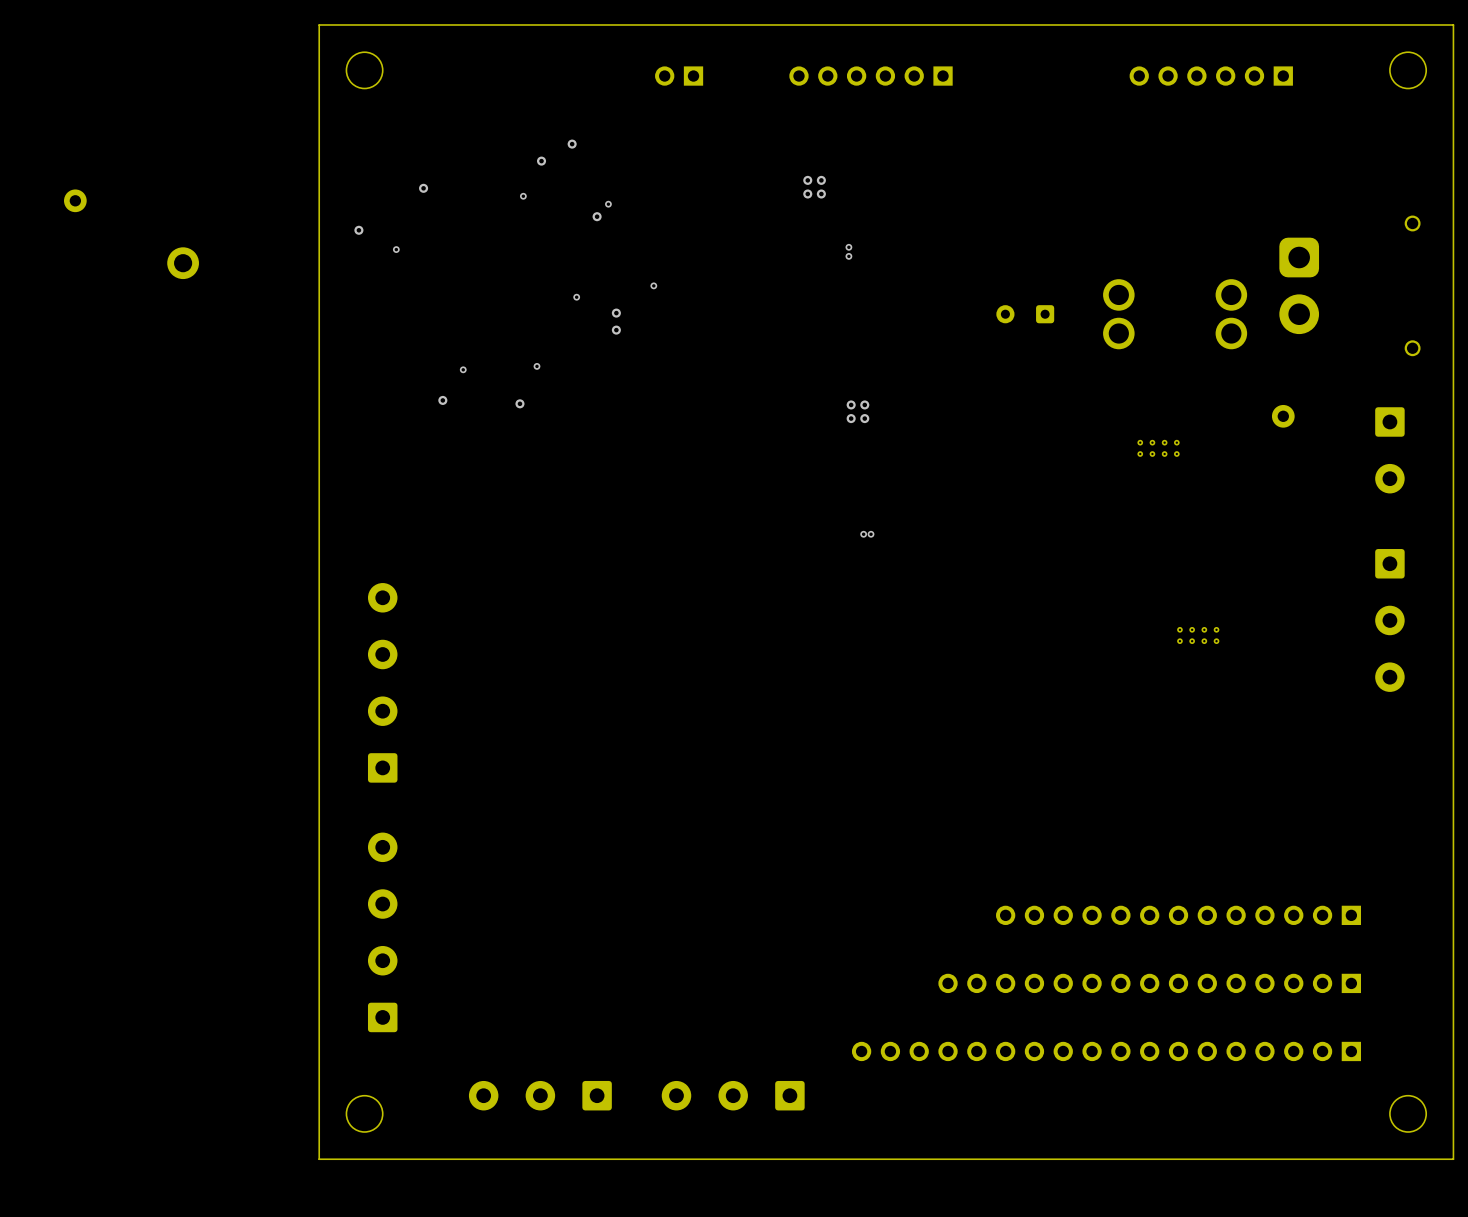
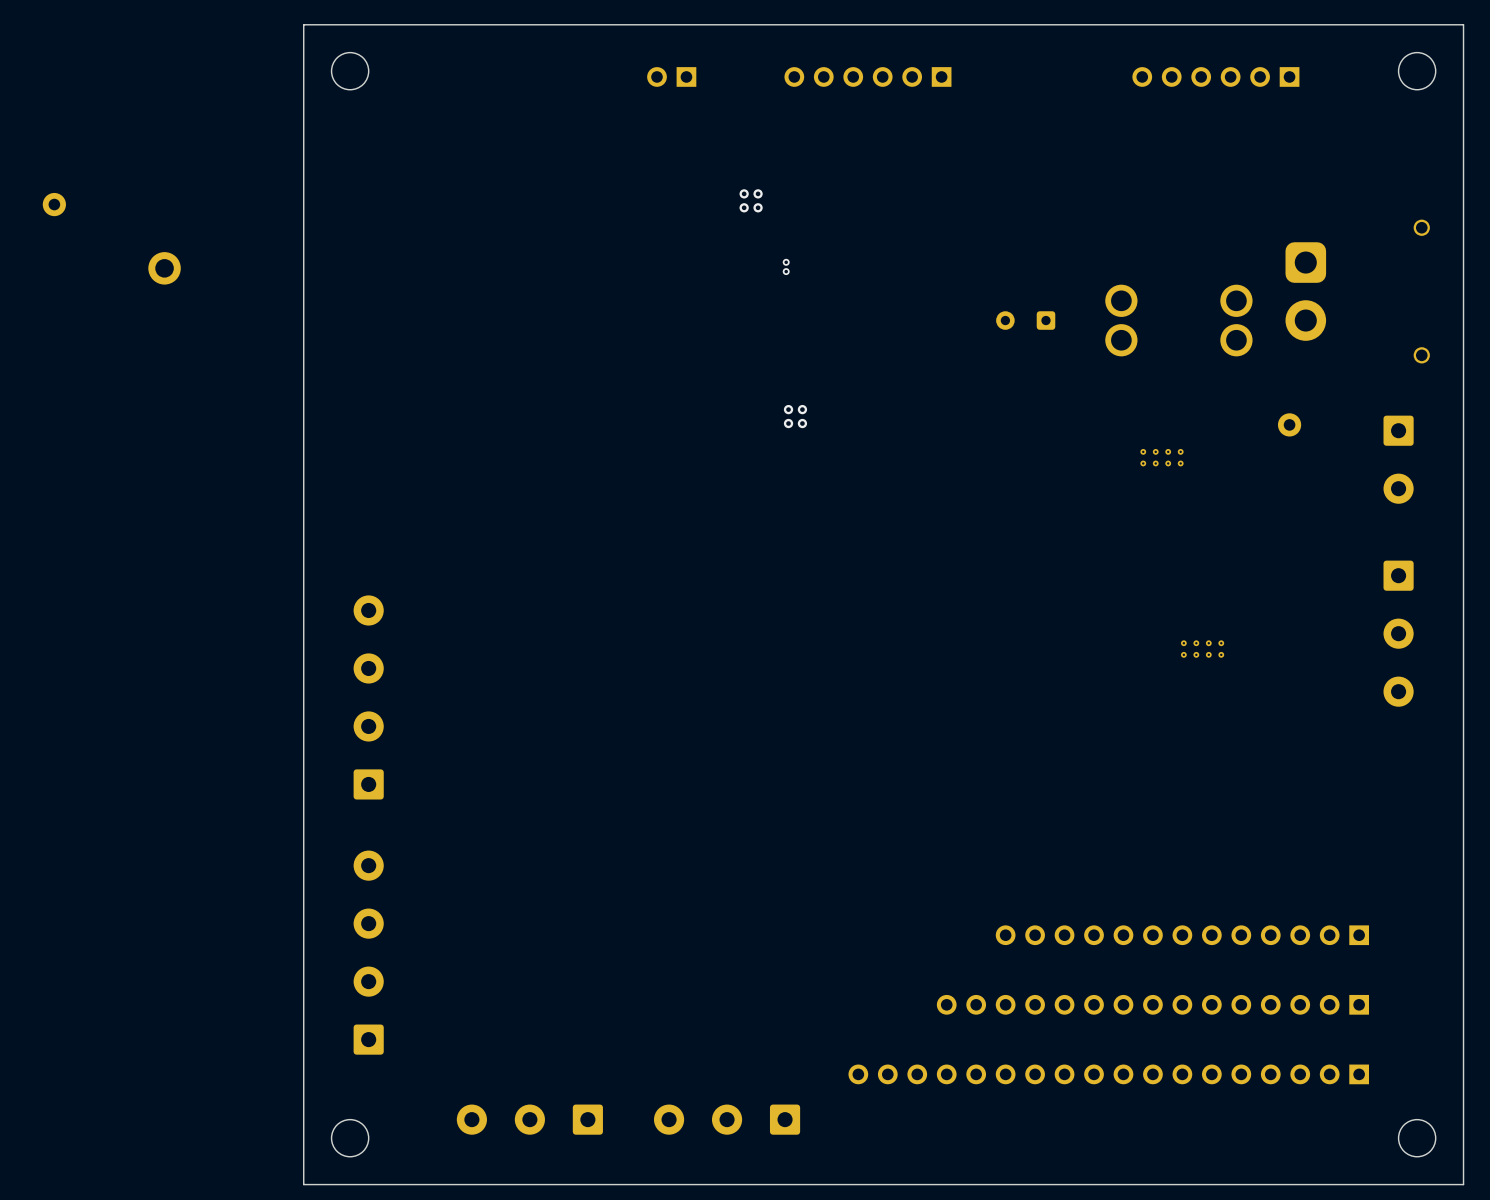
via: (572, 144) -> none
via: (541, 161) -> none
via: (807, 180) -> none
via: (821, 180) -> none
via: (423, 188) -> none
via: none -> (744, 193)
via: none -> (758, 193)
via: (807, 193) -> none
via: (821, 193) -> none
via: (523, 196) -> none
via: none -> (744, 207)
via: none -> (758, 207)
via: (608, 204) -> none
via: (597, 216) -> none
via: (358, 230) -> none
via: (848, 247) -> none
via: (396, 249) -> none
via: (848, 256) -> none
via: none -> (786, 262)
via: none -> (786, 271)
via: (653, 285) -> none
via: (576, 297) -> none
via: (616, 313) -> none
via: (616, 330) -> none
via: (536, 366) -> none
via: (463, 369) -> none
via: (442, 400) -> none
via: none -> (788, 409)
via: none -> (802, 409)
via: (519, 403) -> none
via: (851, 404) -> none
via: (864, 404) -> none
via: none -> (788, 423)
via: none -> (802, 423)
via: (851, 418) -> none
via: (864, 418) -> none
via: (863, 534) -> none
via: (871, 534) -> none

